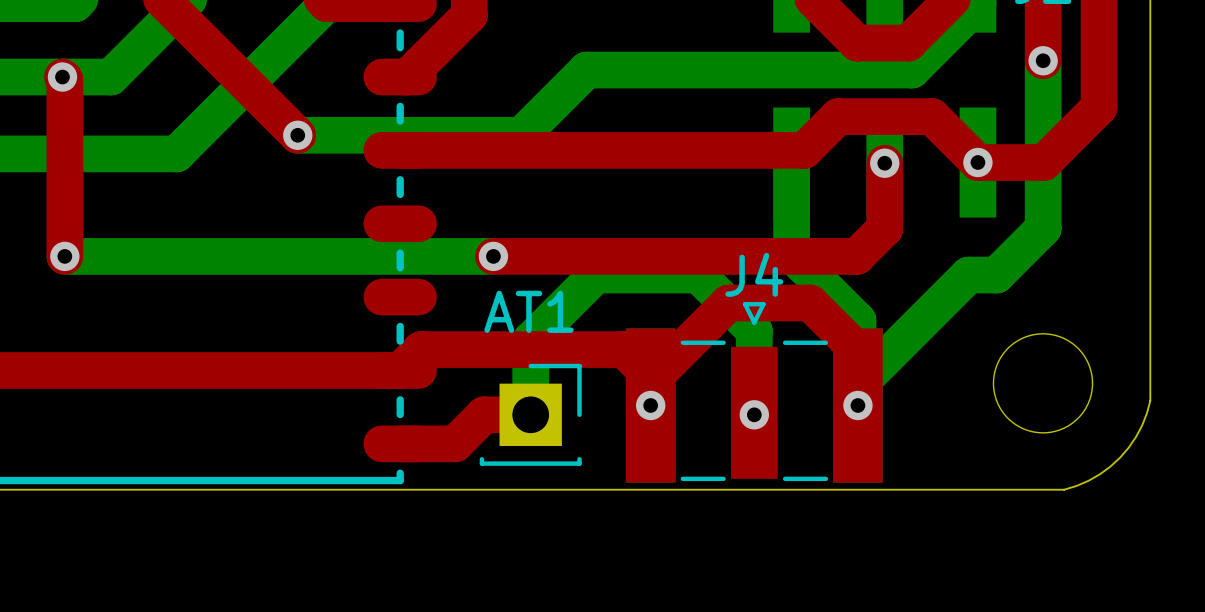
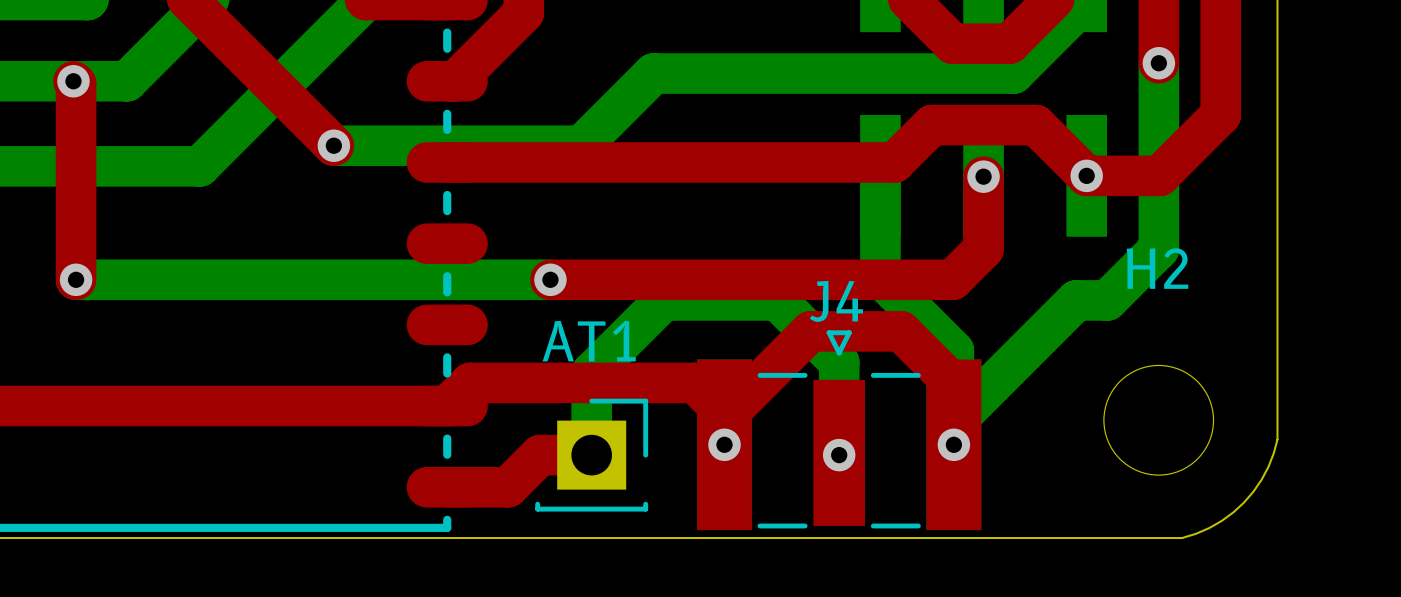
H2 name: none -> H2 (1157, 268)

